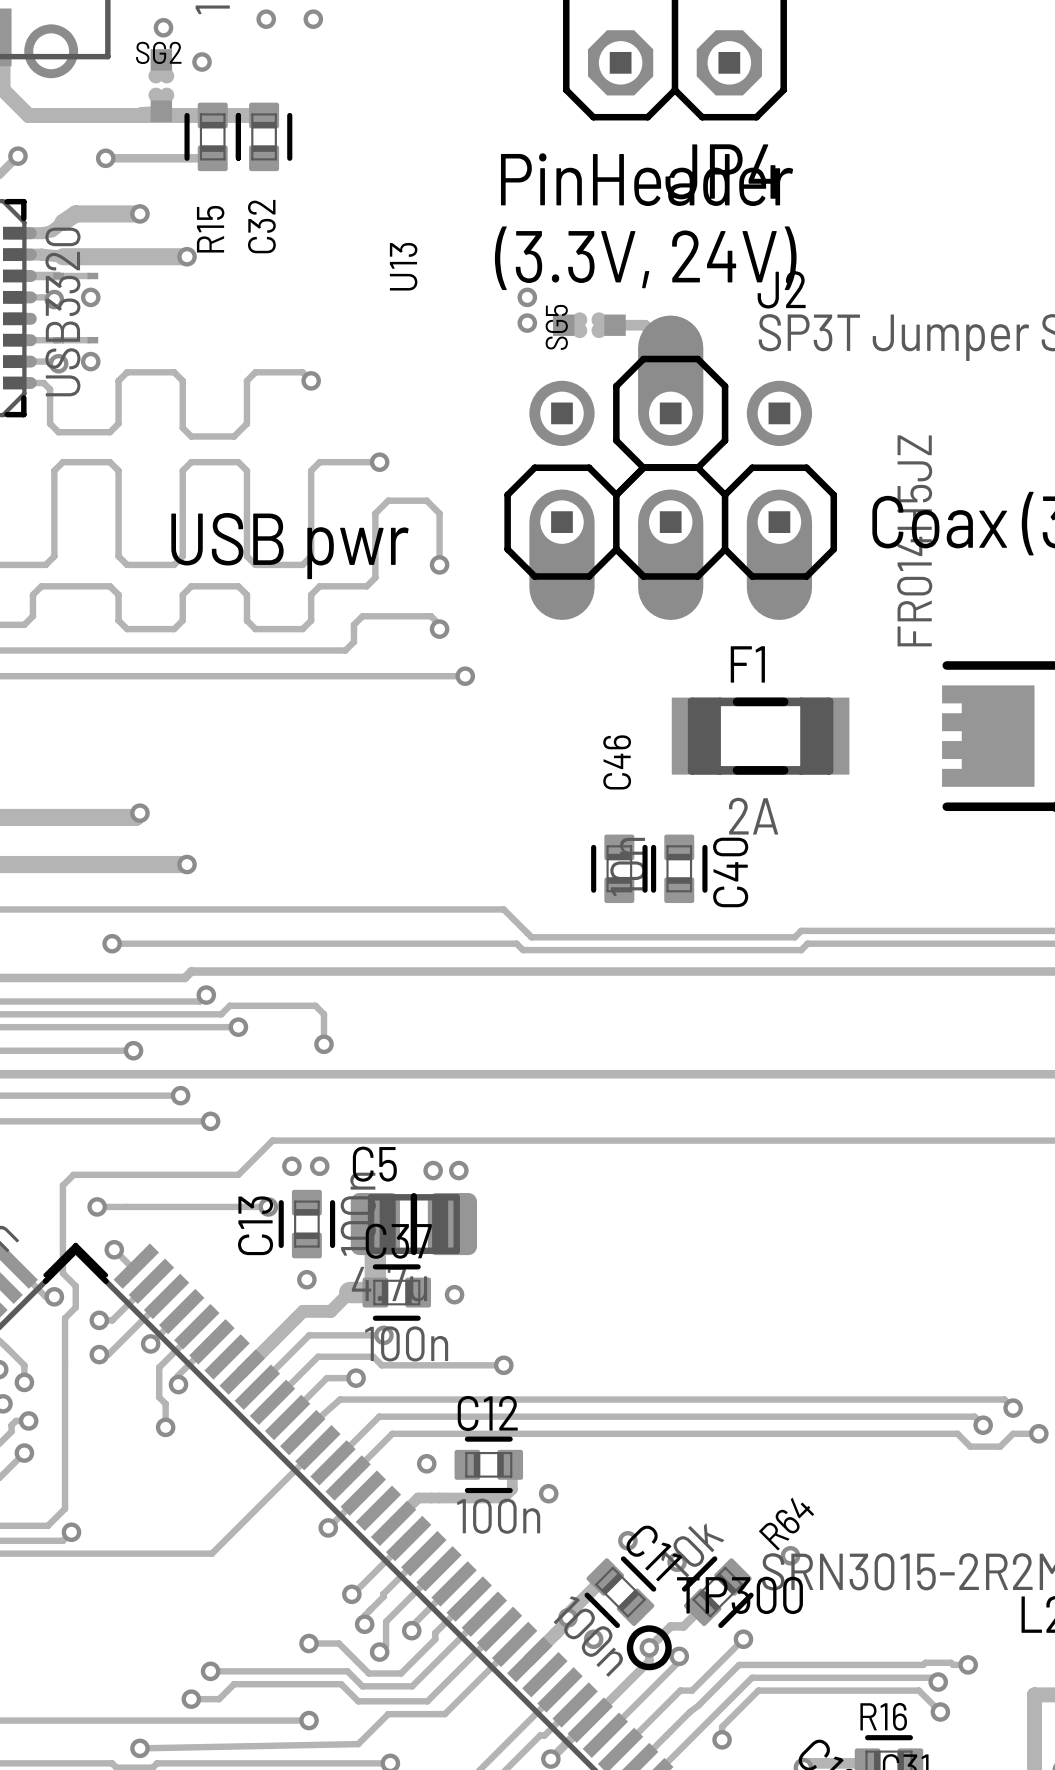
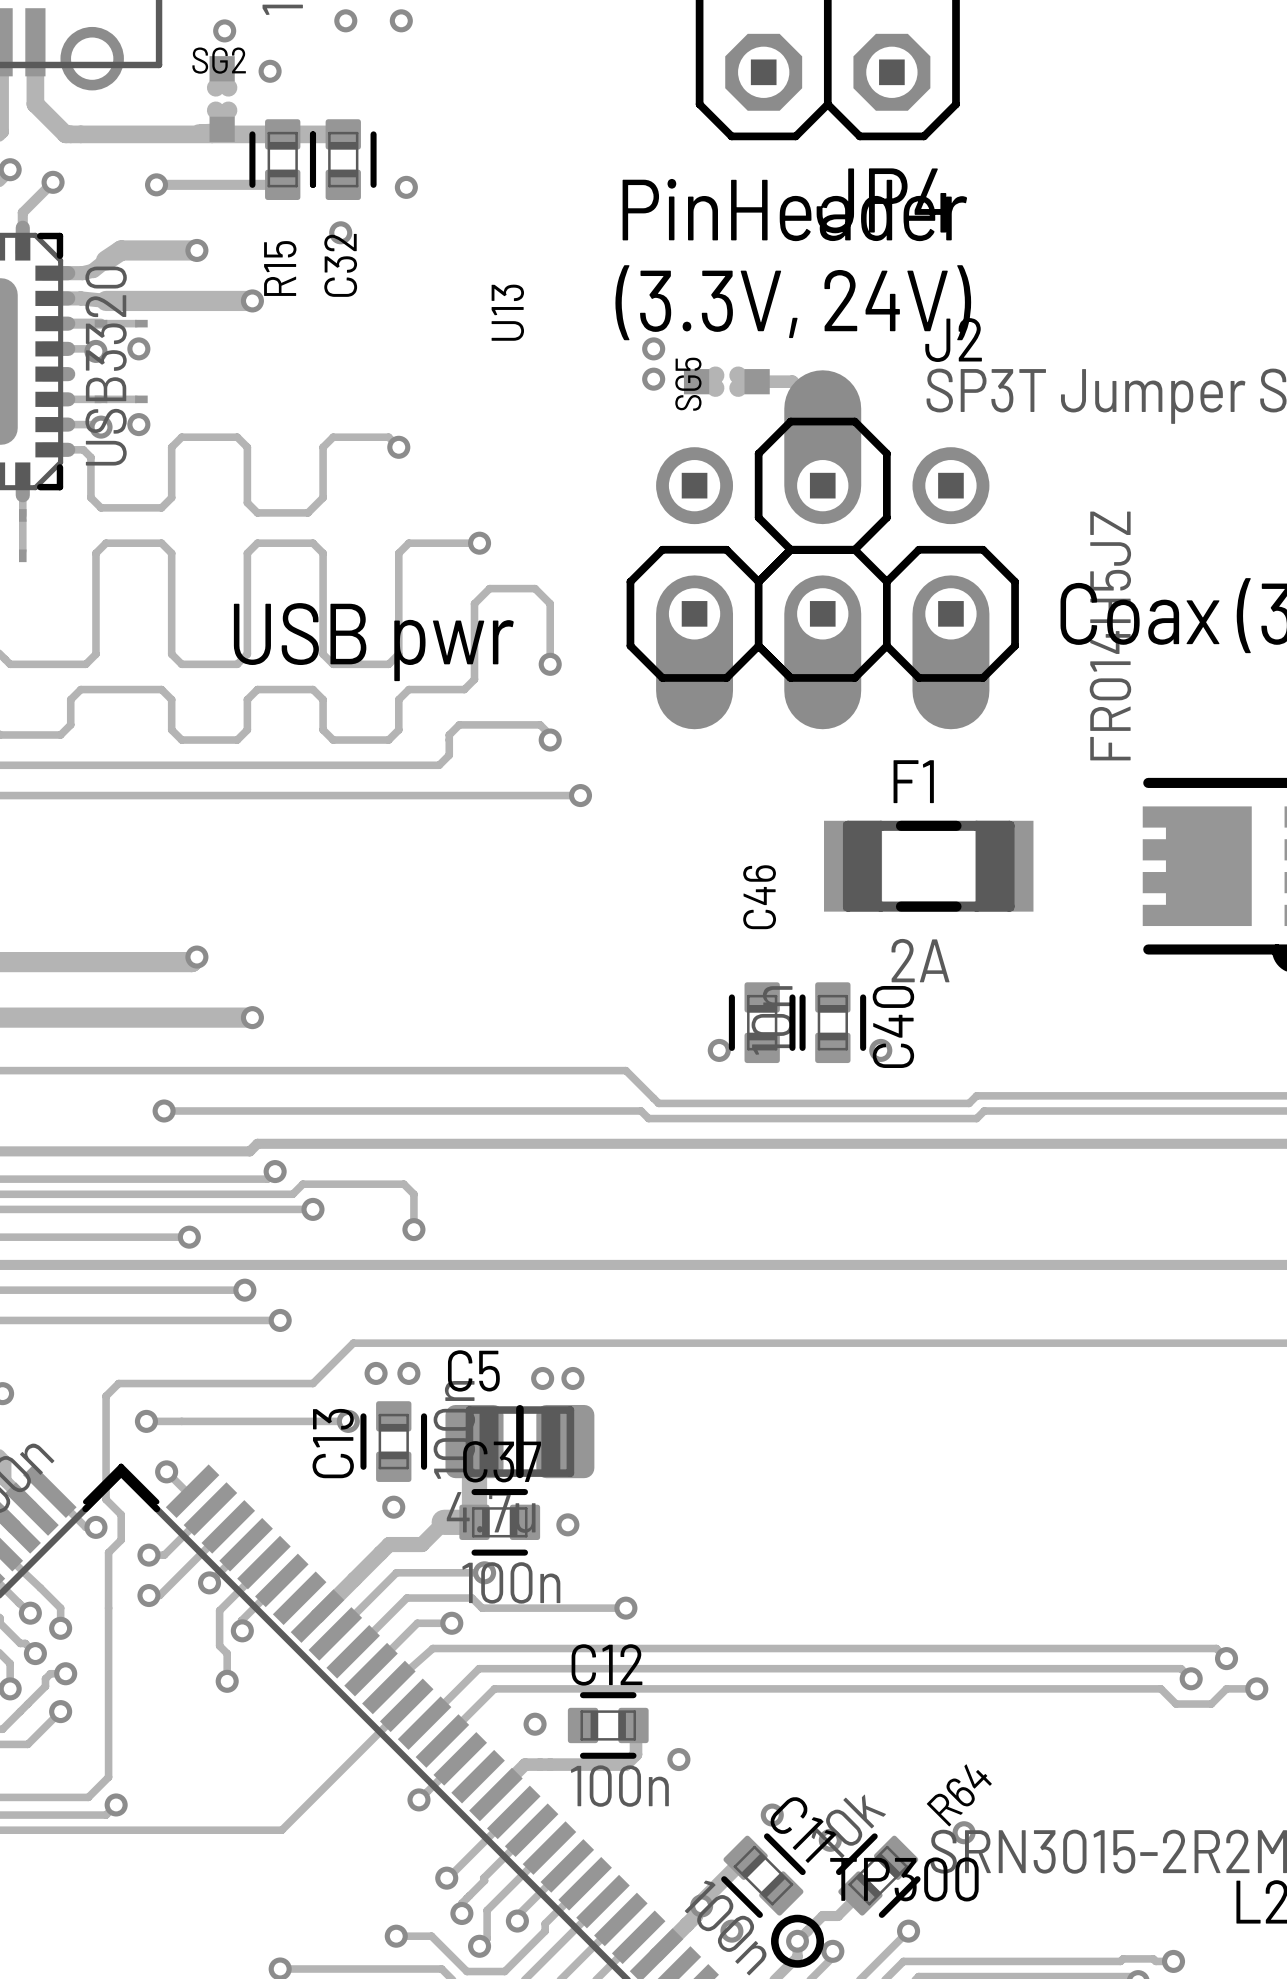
via: none -> (406, 187)
via: none -> (340, 232)
via: none -> (719, 1050)
via: none -> (880, 1050)

